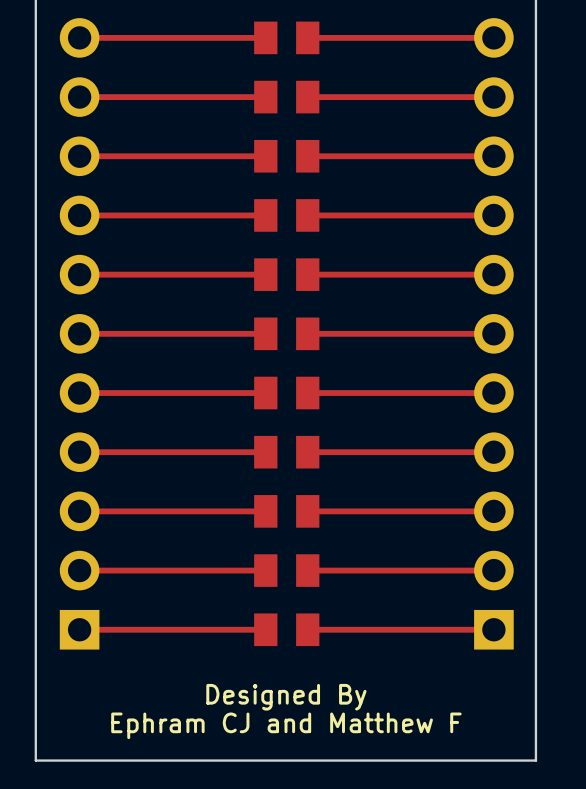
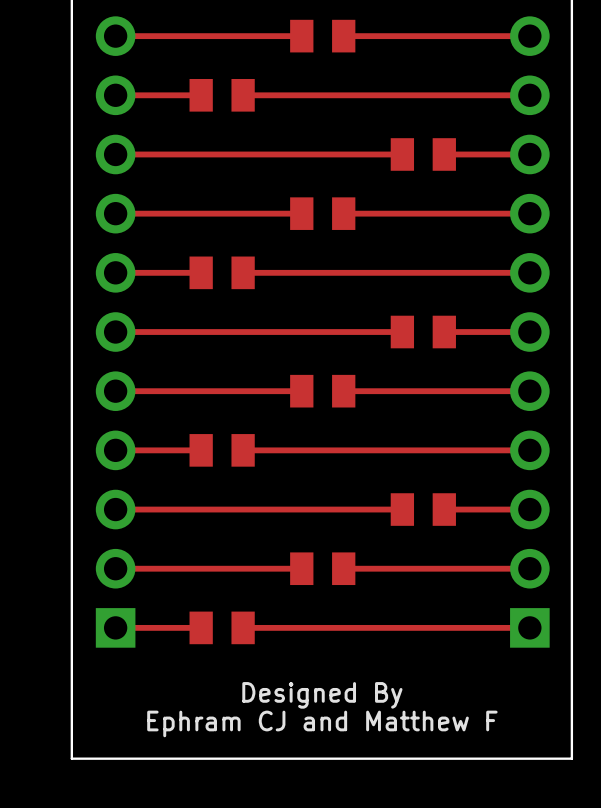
part: none -> (222, 95)
top track: (207, 97) (165, 97) -> (343, 95) (301, 95)
part: (286, 97) -> none
part: (286, 156) -> none
part: none -> (423, 154)
top track: (408, 156) (366, 156) -> (343, 154) (301, 154)
part: none -> (222, 272)
top track: (207, 274) (165, 274) -> (343, 272) (301, 272)
part: (286, 274) -> none
part: (286, 333) -> none
part: none -> (423, 332)
top track: (408, 333) (366, 333) -> (343, 332) (301, 332)
part: none -> (222, 450)
top track: (207, 452) (165, 452) -> (343, 450) (301, 450)
part: (286, 452) -> none
part: (286, 511) -> none
part: none -> (423, 509)
top track: (408, 511) (366, 511) -> (343, 509) (301, 509)
part: none -> (222, 627)
top track: (207, 629) (165, 629) -> (343, 627) (301, 627)
part: (286, 629) -> none

